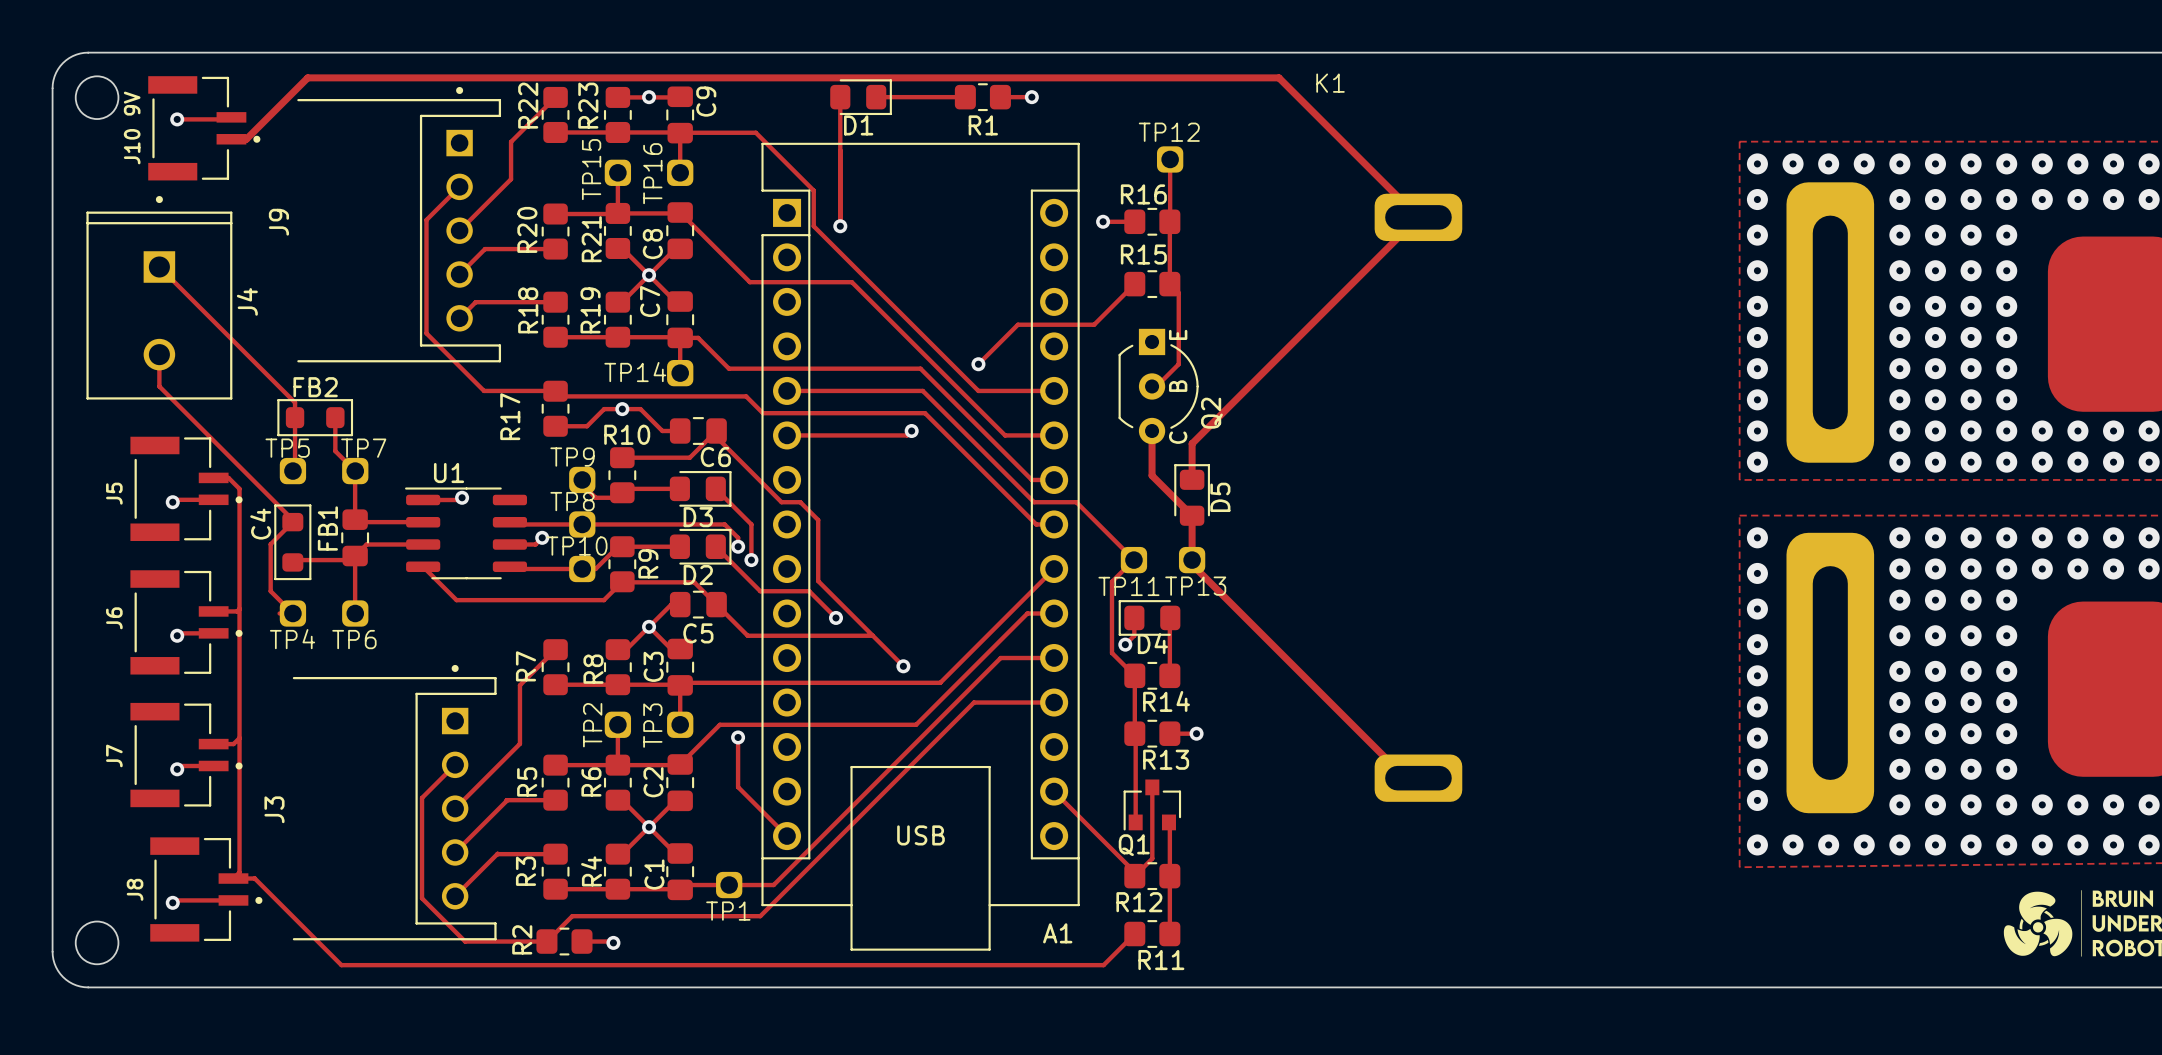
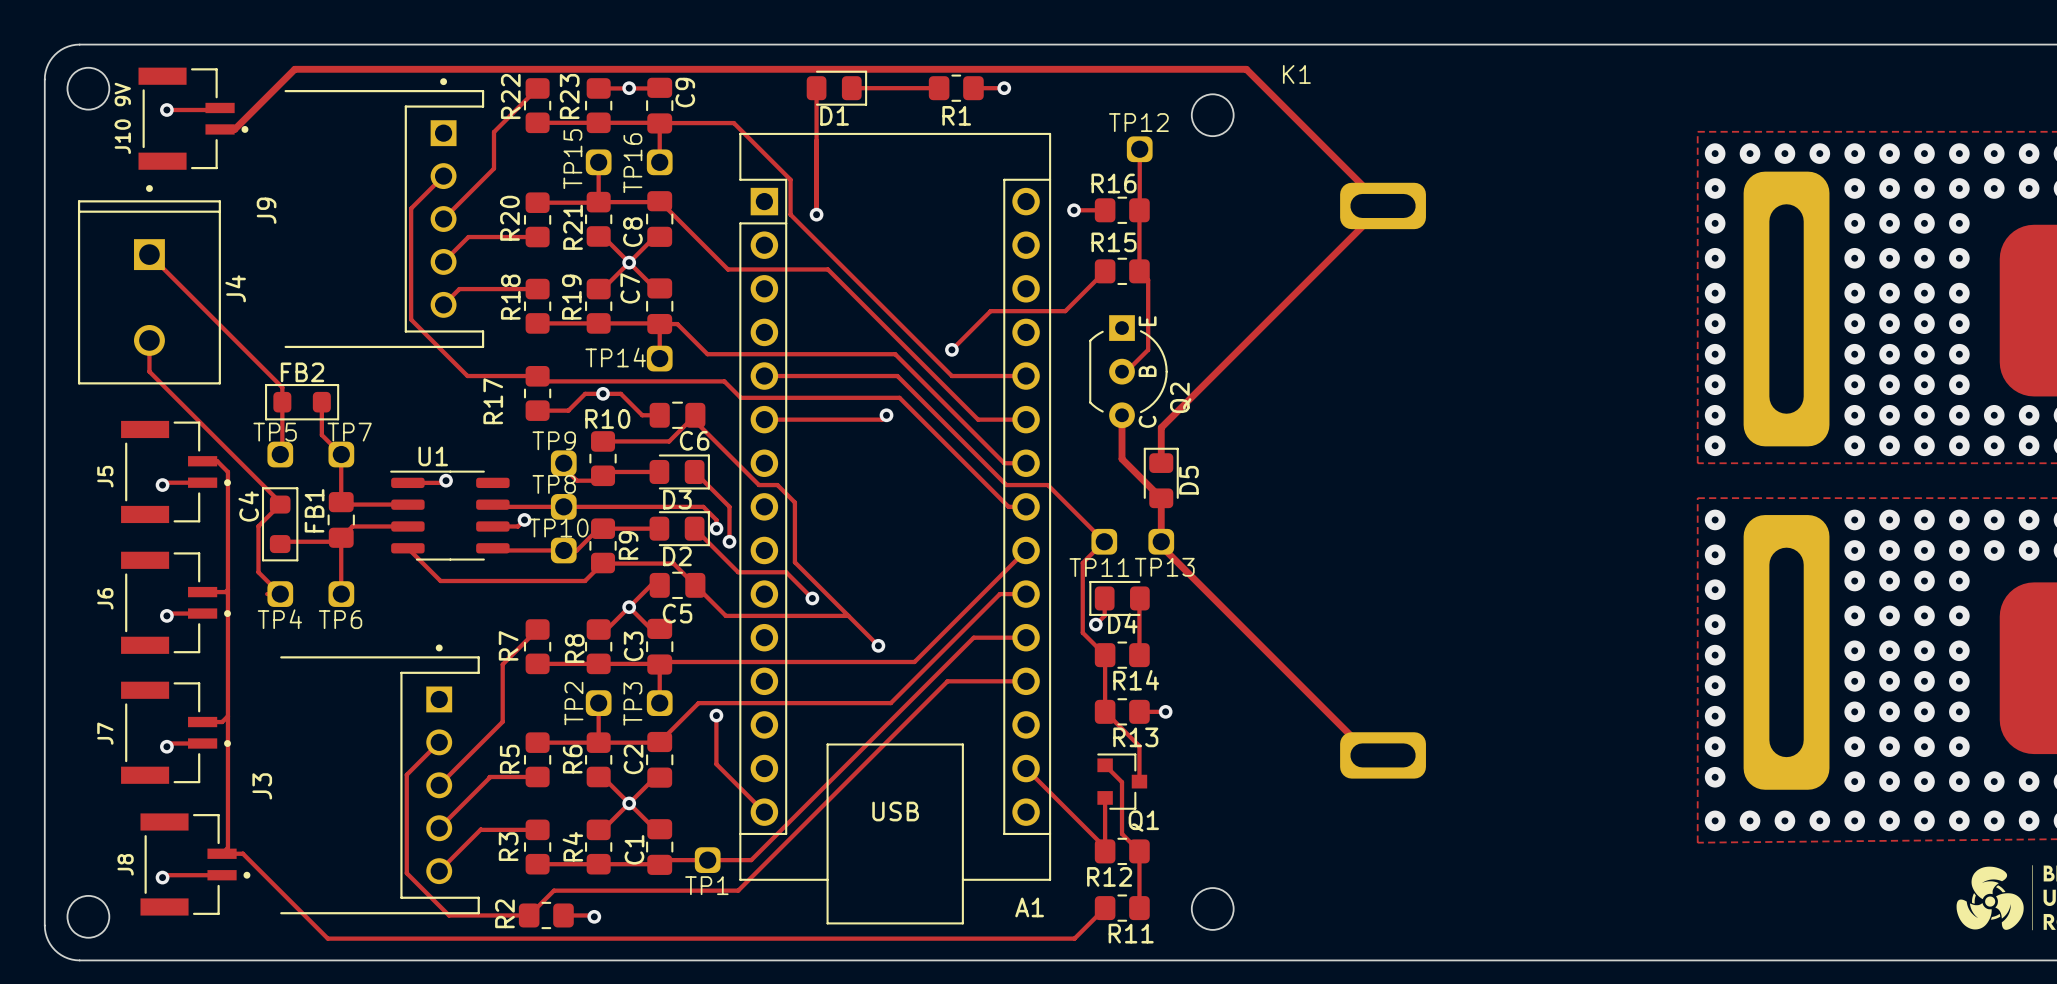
round board edge: none -> [1190, 93, 1235, 138]
track: none -> (1105, 712) (1139, 746) (1139, 781)
track: (1135, 739) (1135, 822) -> none
track: (1152, 787) (1152, 858) (1134, 876) -> none
Q1 rotation: 0° (1152, 805) -> 90° clockwise (1122, 781)
track: none -> (1105, 797) (1105, 847)
track: (1168, 822) (1169, 876) -> (1105, 765) (1122, 782) (1122, 833) (1139, 851)
Q1 name position: Q1 (1134, 845) -> Q1 (1143, 821)
round board edge: none -> [1190, 887, 1235, 931]

